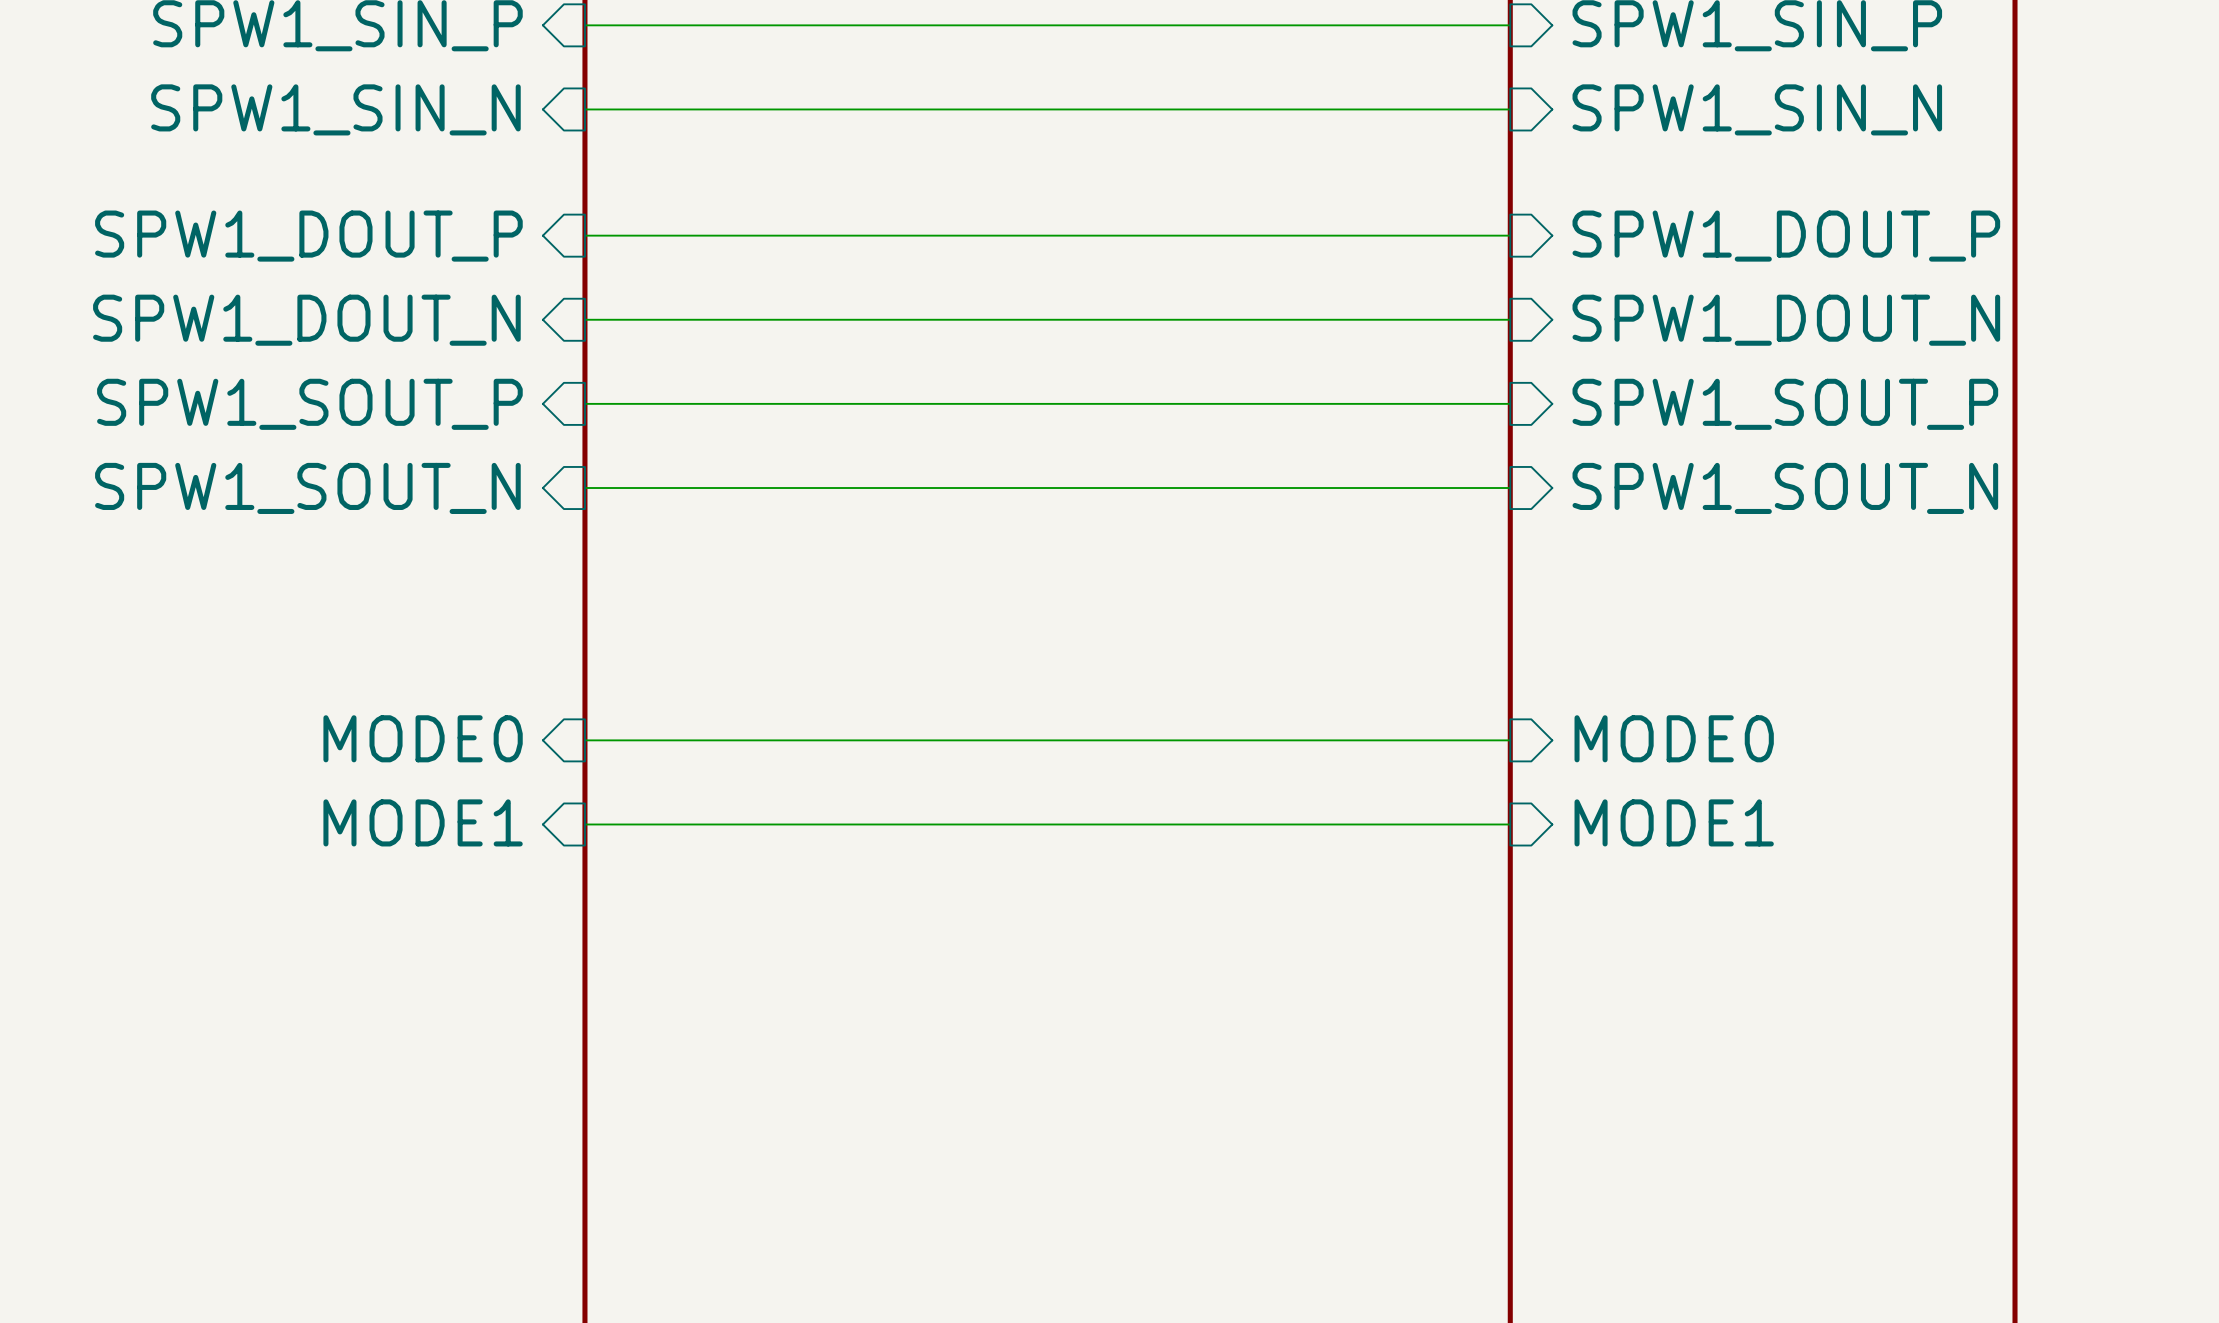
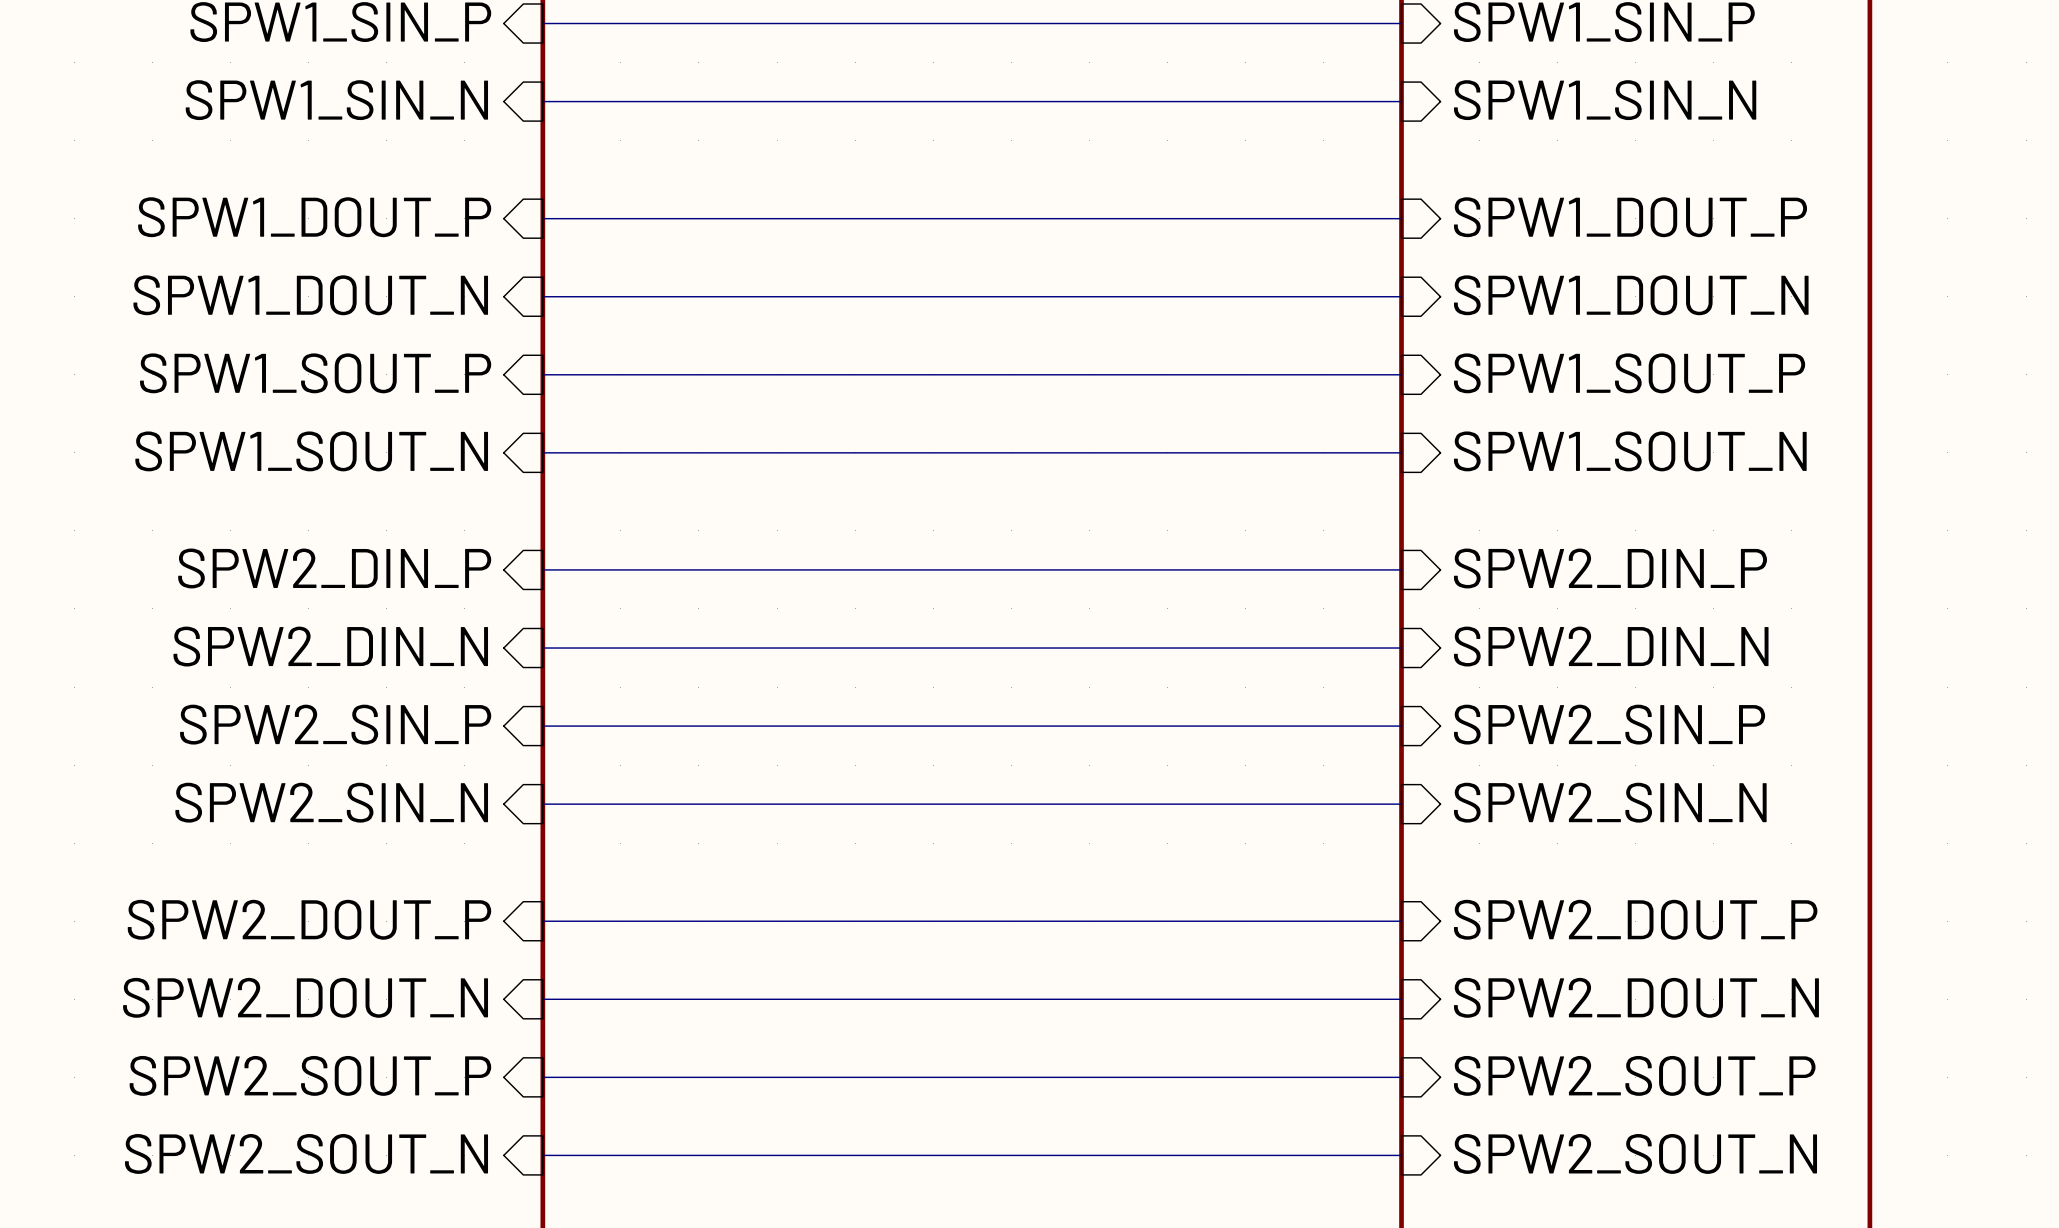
sheet pin: none -> SPW2_DIN_P (334, 568)
wire: none -> (542, 569) (1401, 569)
sheet pin: none -> SPW2_DIN_P (1610, 568)
sheet pin: none -> SPW2_DIN_N (330, 646)
wire: none -> (542, 648) (1401, 648)
sheet pin: none -> SPW2_DIN_N (1611, 646)
sheet pin: MODE0 (423, 738) -> none
sheet pin: MODE0 (1674, 738) -> none
wire: (584, 740) (1510, 740) -> (542, 726) (1401, 726)
sheet pin: none -> SPW2_SIN_P (335, 724)
sheet pin: none -> SPW2_SIN_P (1609, 724)
sheet pin: MODE1 (423, 822) -> none
sheet pin: MODE1 (1674, 822) -> none
wire: (584, 824) (1510, 824) -> (542, 804) (1401, 804)
sheet pin: none -> SPW2_SIN_N (331, 802)
sheet pin: none -> SPW2_SIN_N (1610, 802)
wire: none -> (542, 921) (1401, 921)
sheet pin: none -> SPW2_DOUT_P (309, 919)
sheet pin: none -> SPW2_DOUT_P (1635, 919)
wire: none -> (542, 999) (1401, 999)
sheet pin: none -> SPW2_DOUT_N (305, 997)
sheet pin: none -> SPW2_DOUT_N (1636, 997)
wire: none -> (542, 1077) (1401, 1077)
sheet pin: none -> SPW2_SOUT_P (310, 1075)
sheet pin: none -> SPW2_SOUT_P (1634, 1075)
sheet pin: none -> SPW2_SOUT_N (306, 1153)
wire: none -> (542, 1155) (1401, 1155)
sheet pin: none -> SPW2_SOUT_N (1635, 1153)

